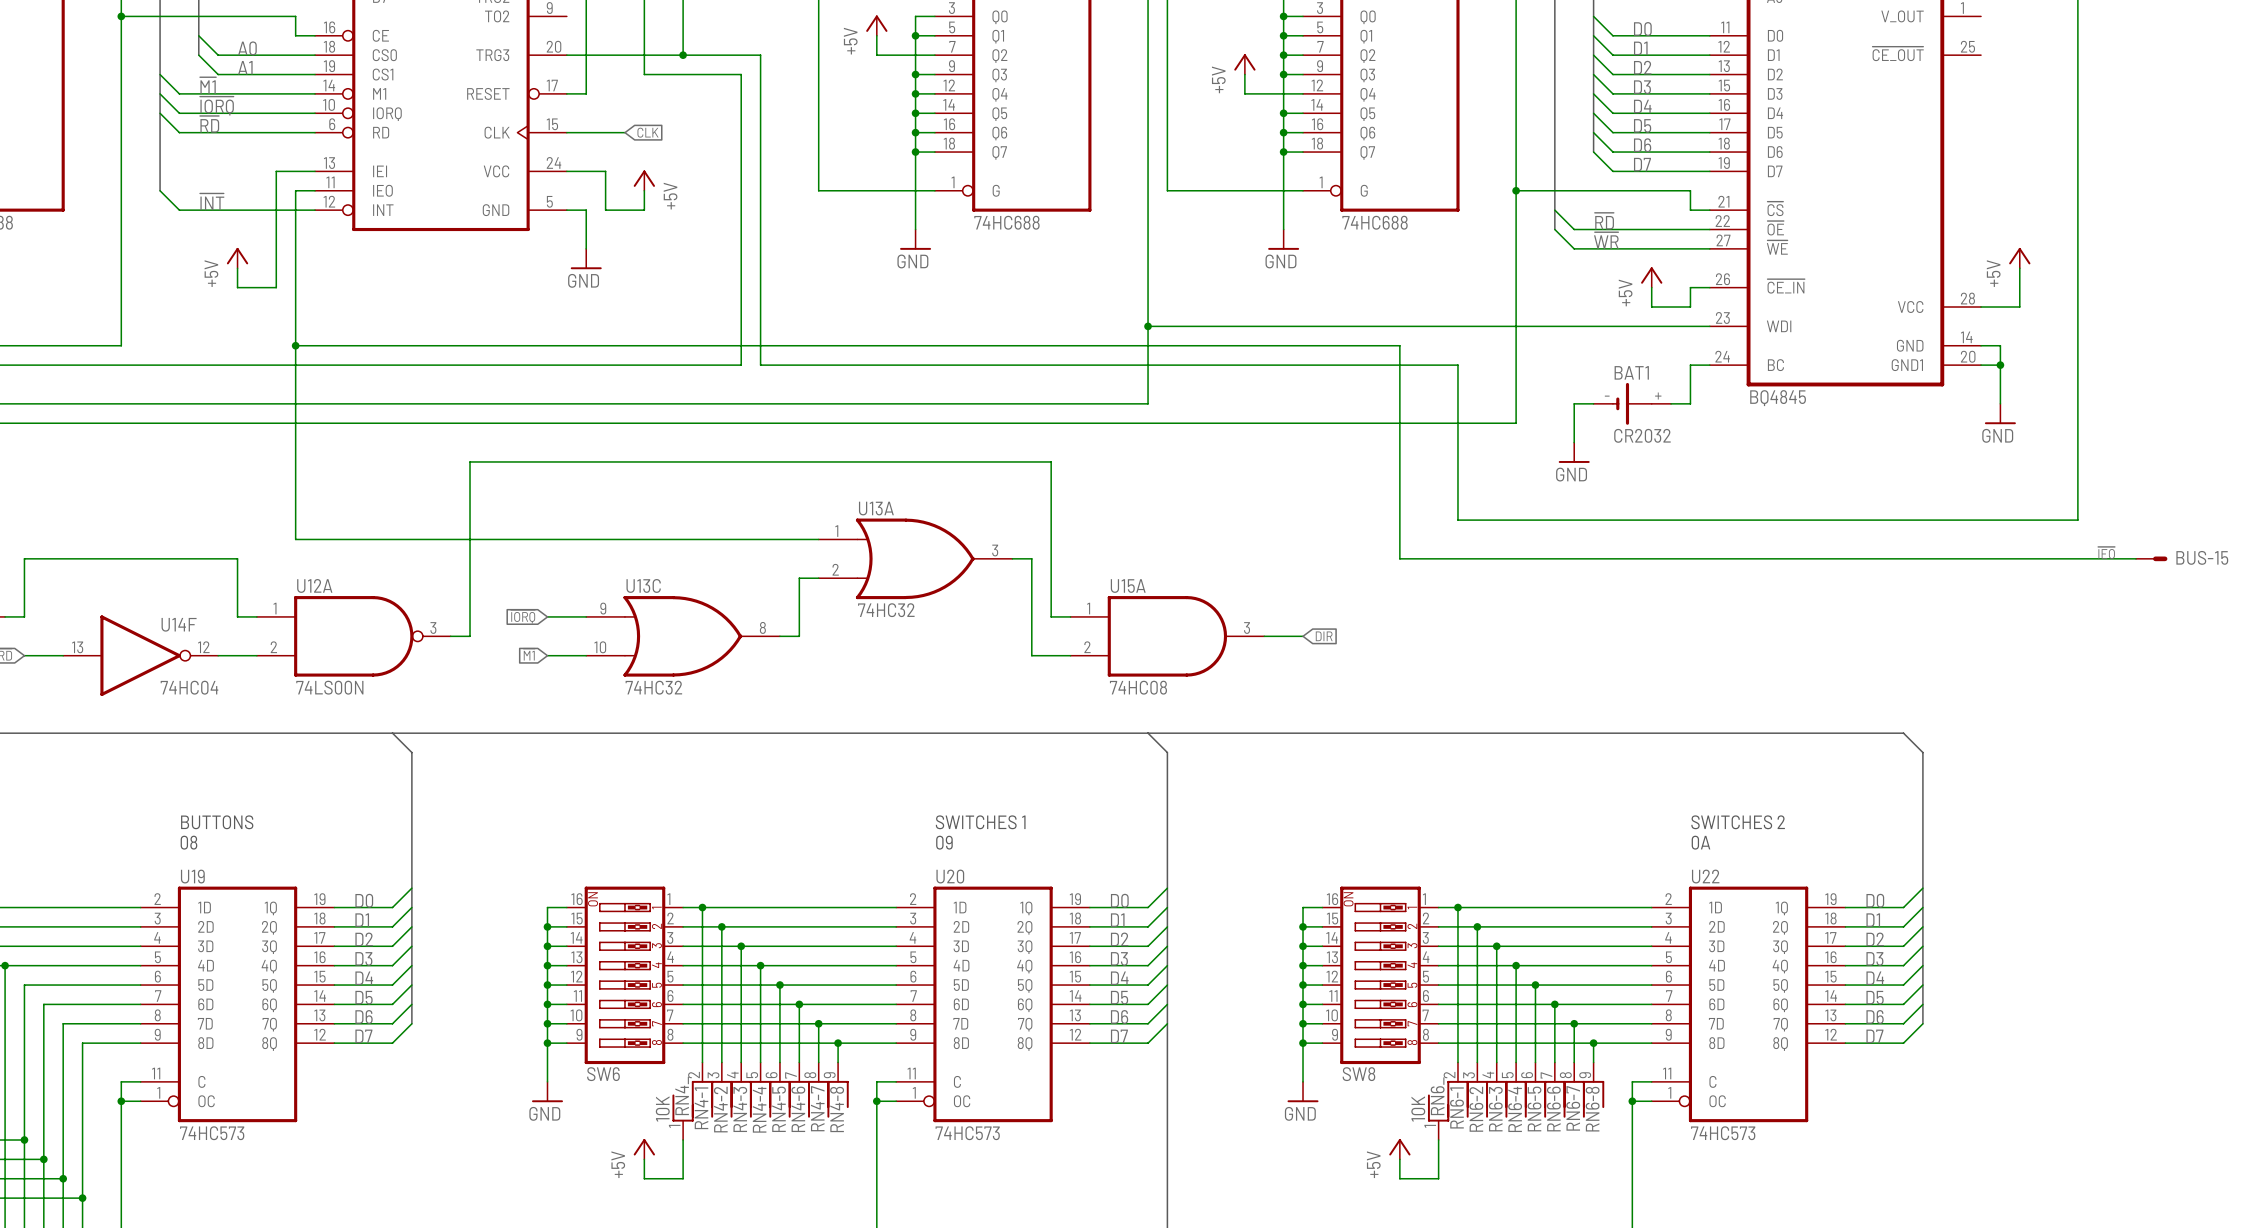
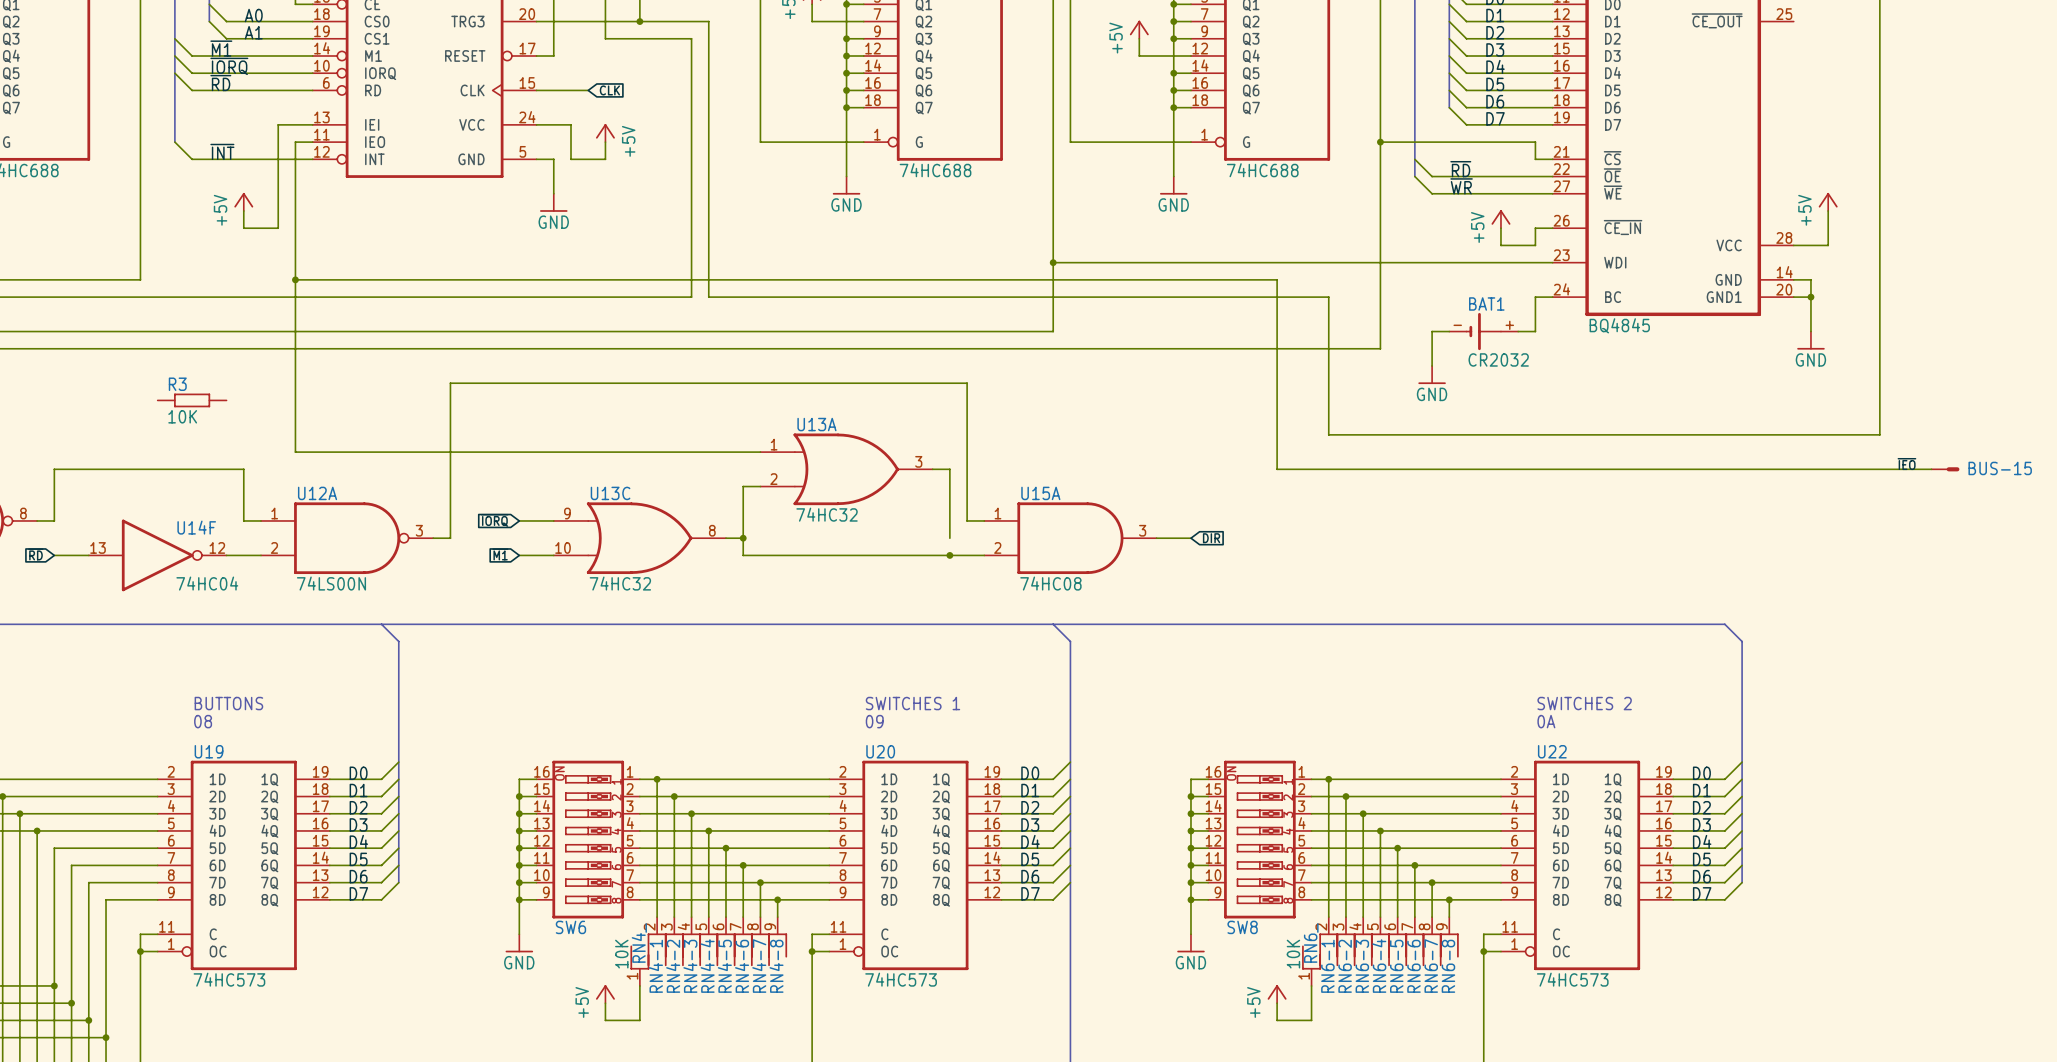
R3: none -> 10K (192, 400)
junction: none -> (743, 538)
wire: (1031, 636) (1031, 655) -> (743, 538) (743, 555) (949, 555)
junction: none -> (949, 555)

